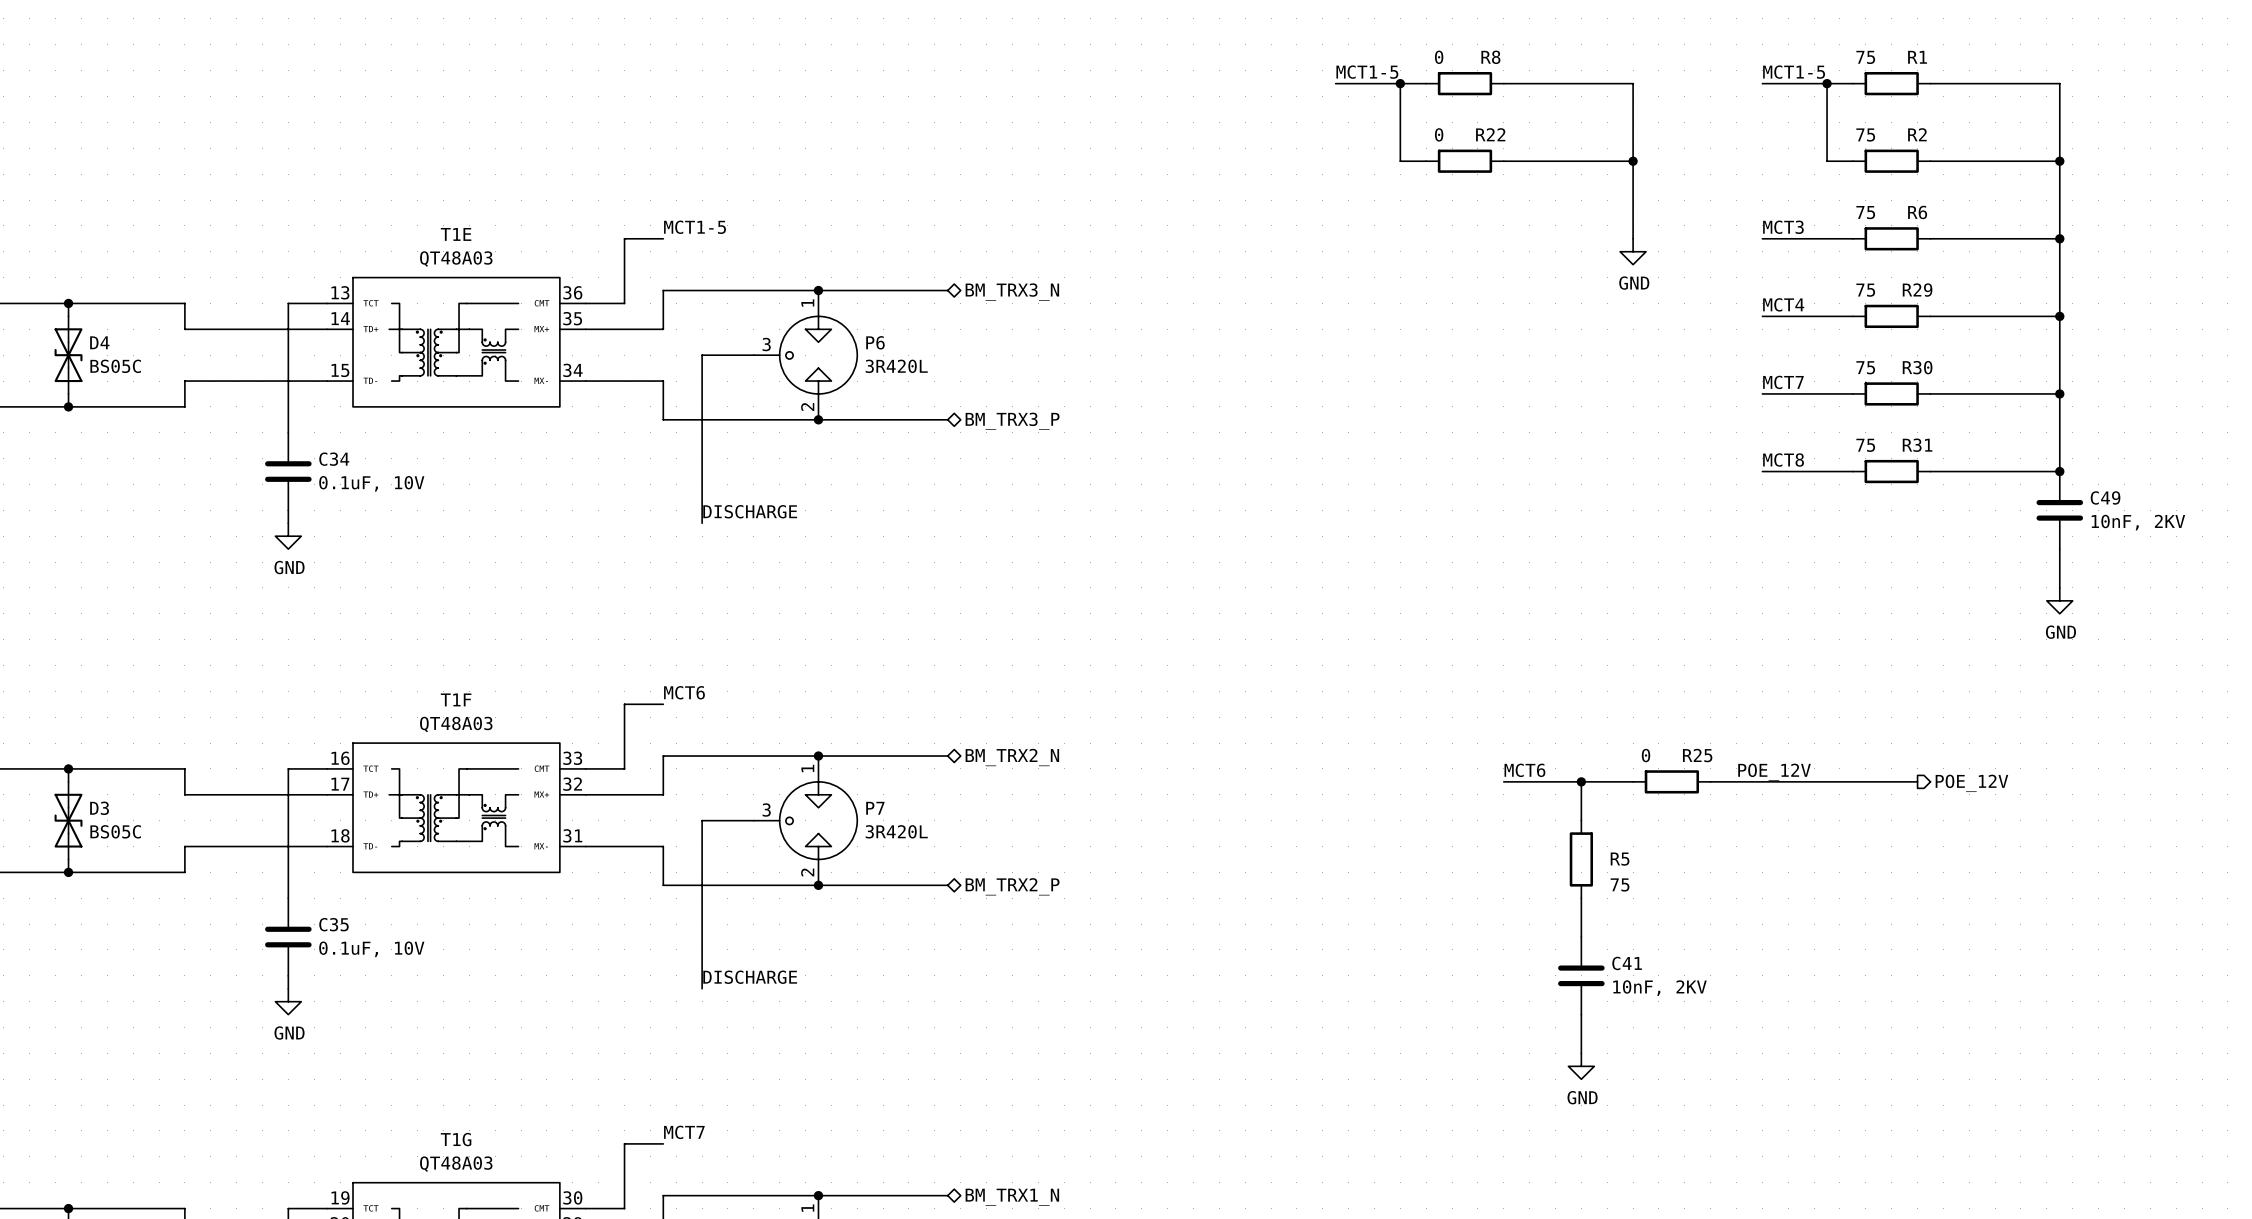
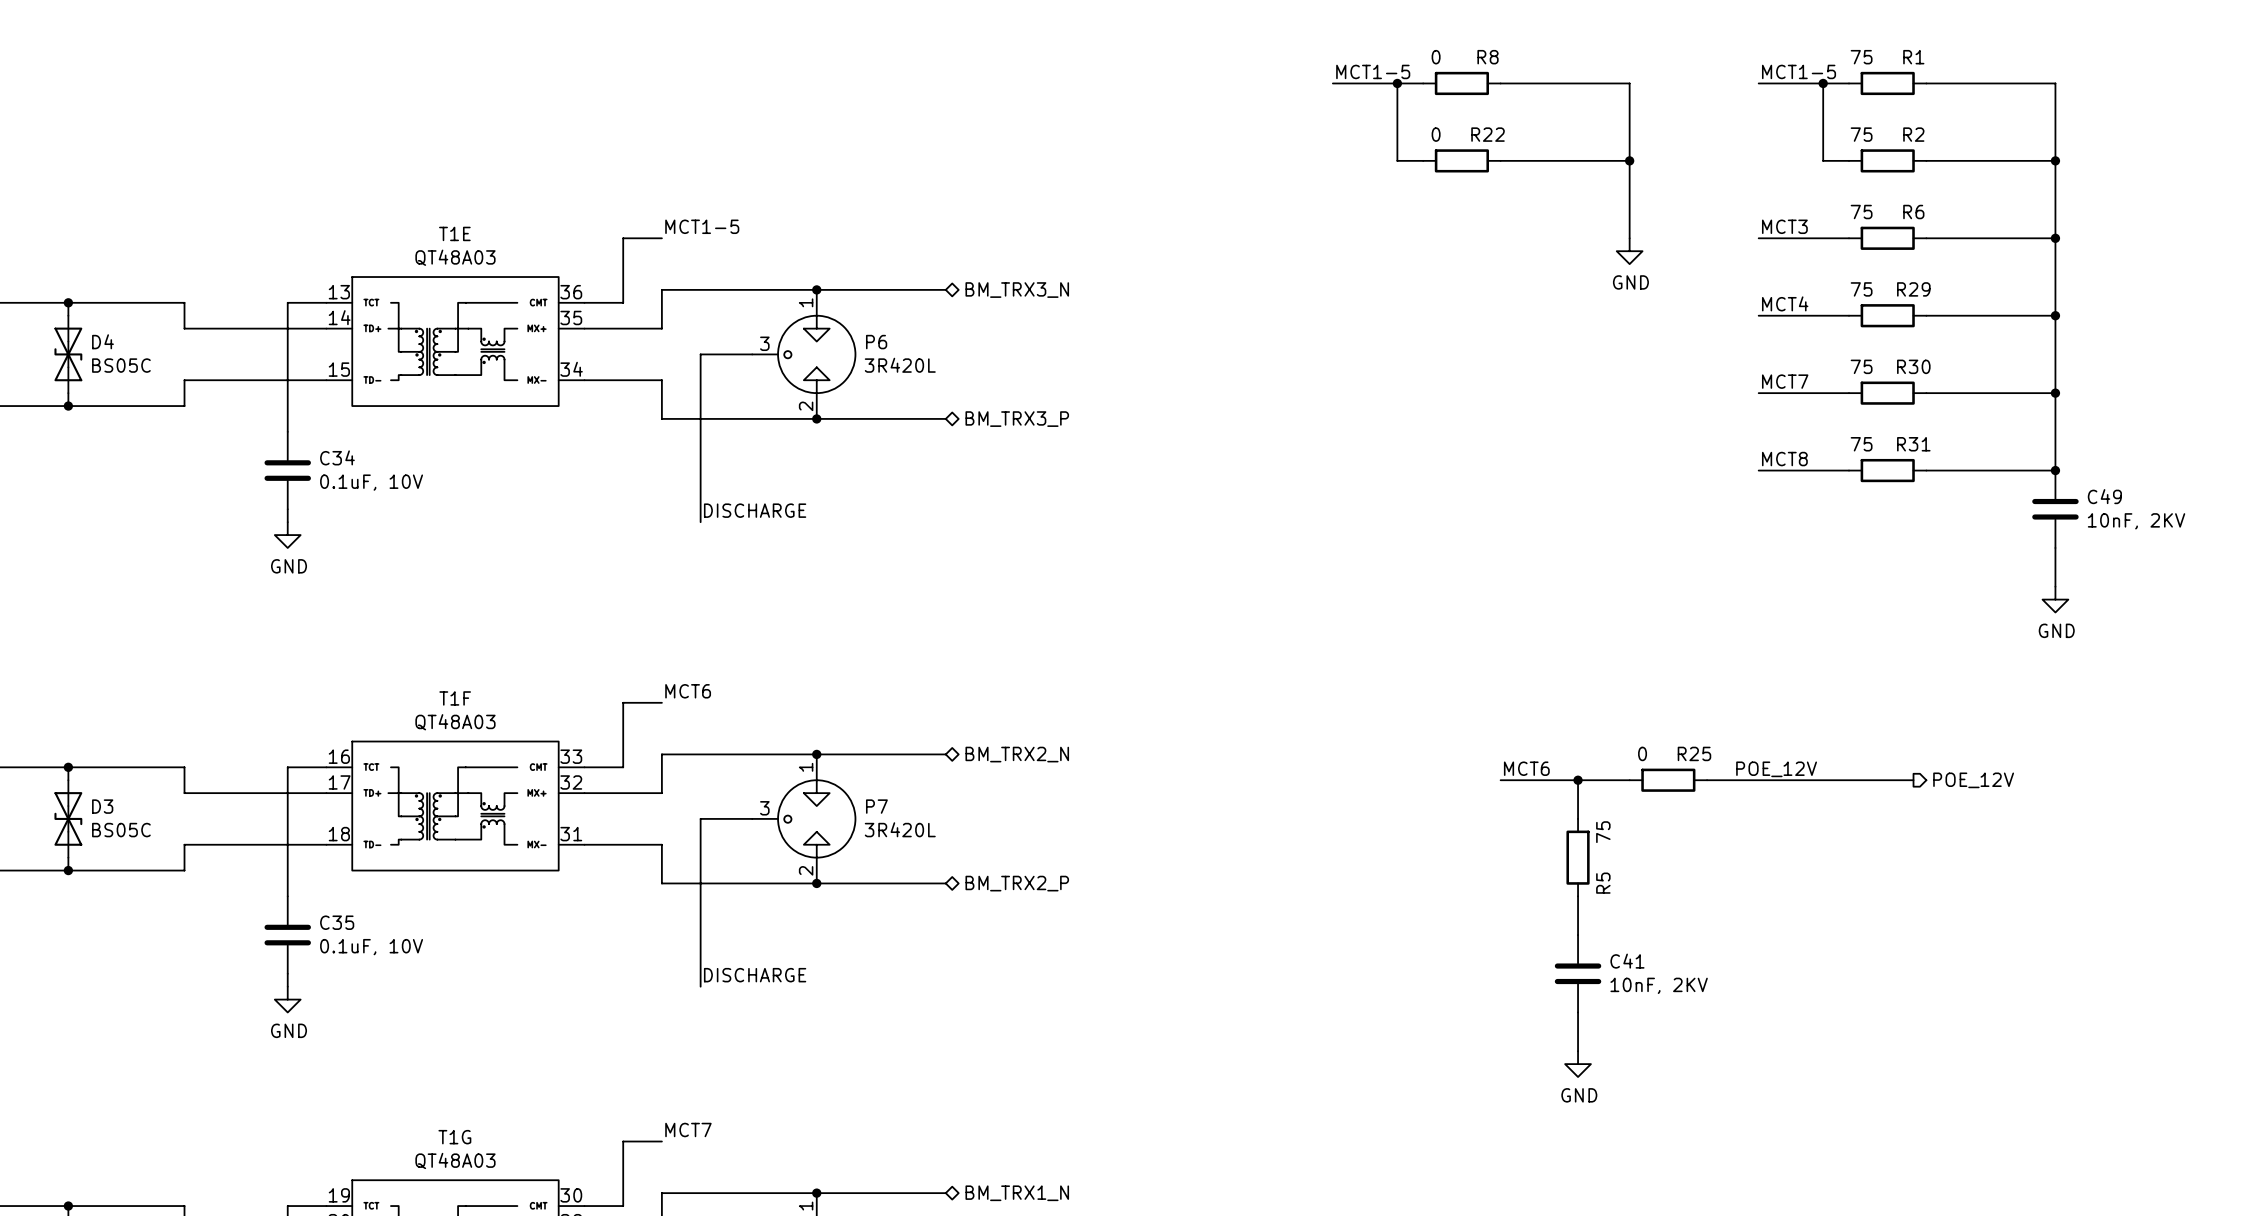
R5 name rotation: 0° (1620, 859) -> 90° counterclockwise (1603, 883)
R5 value rotation: 0° (1620, 884) -> 90° counterclockwise (1603, 832)
R5 value position: 75 (1620, 884) -> 75 (1603, 832)

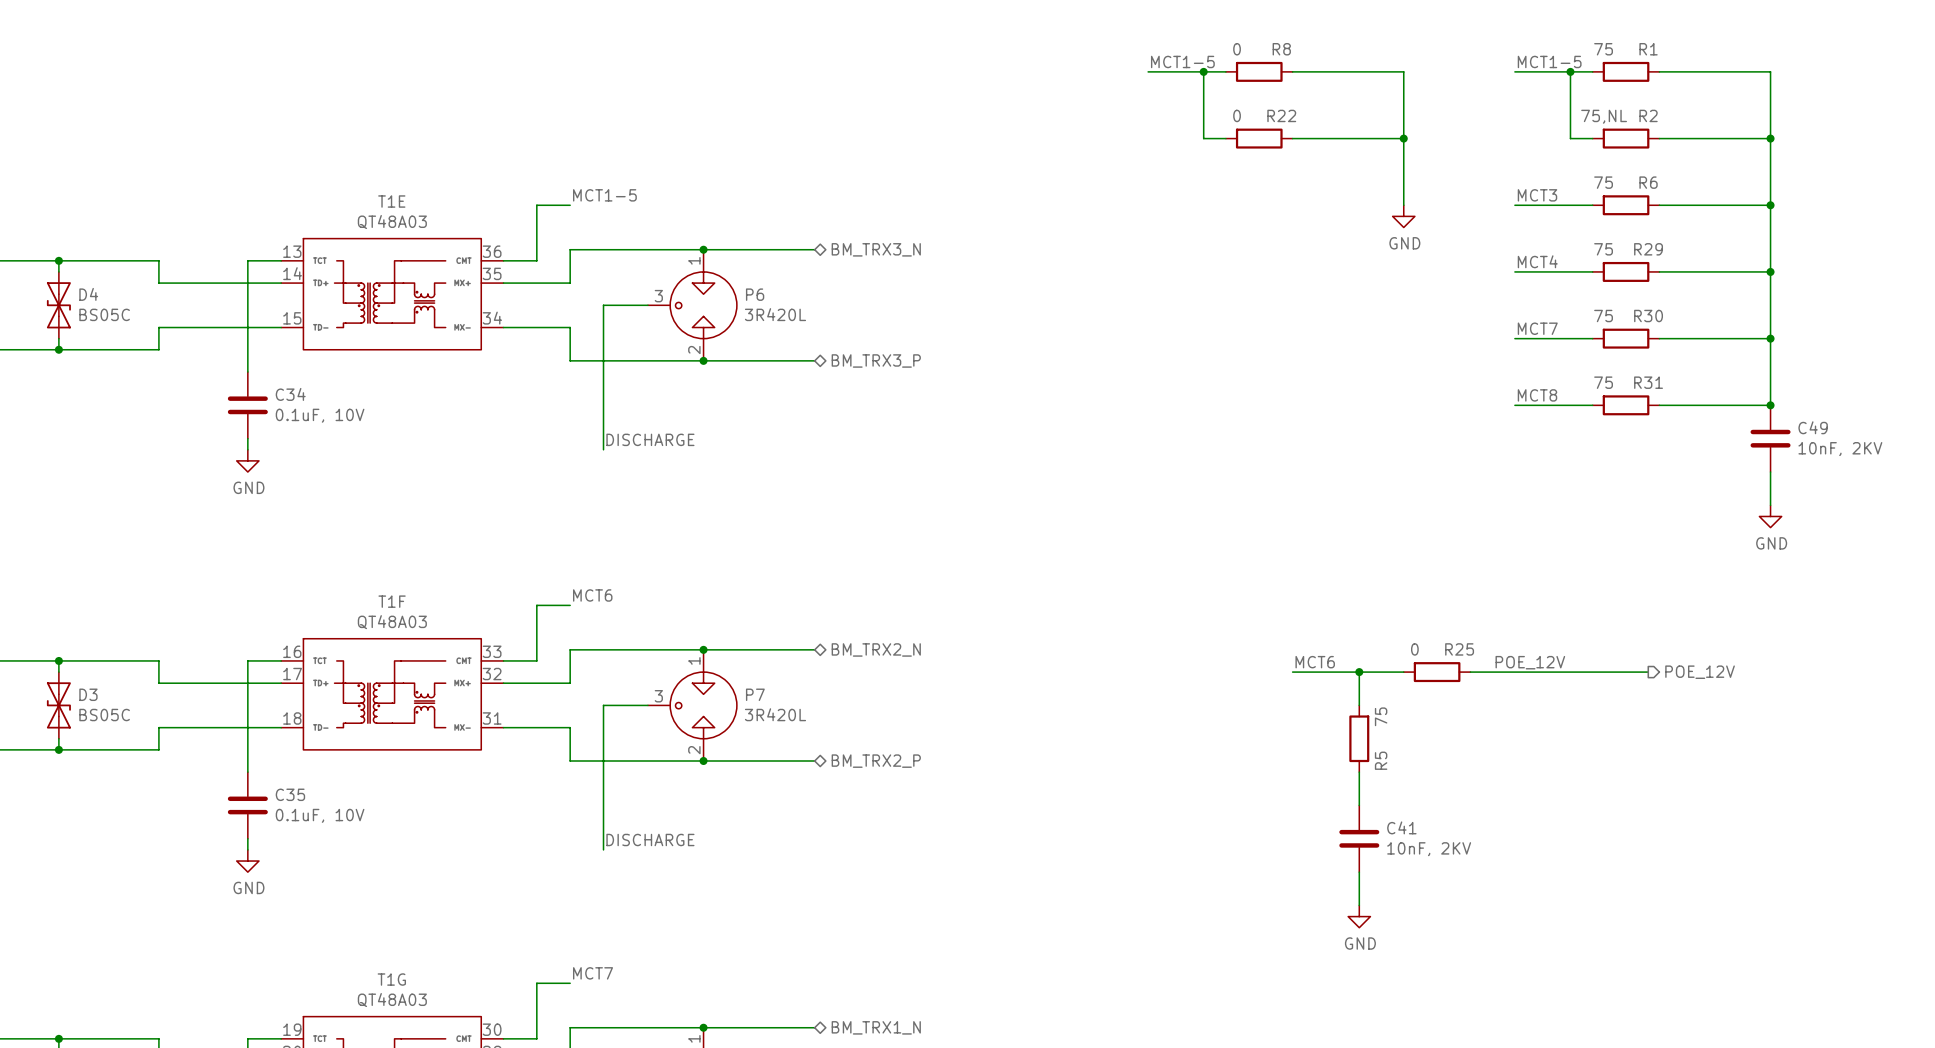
R2 value: 75 (1861, 134) -> 75,NL (1604, 116)

